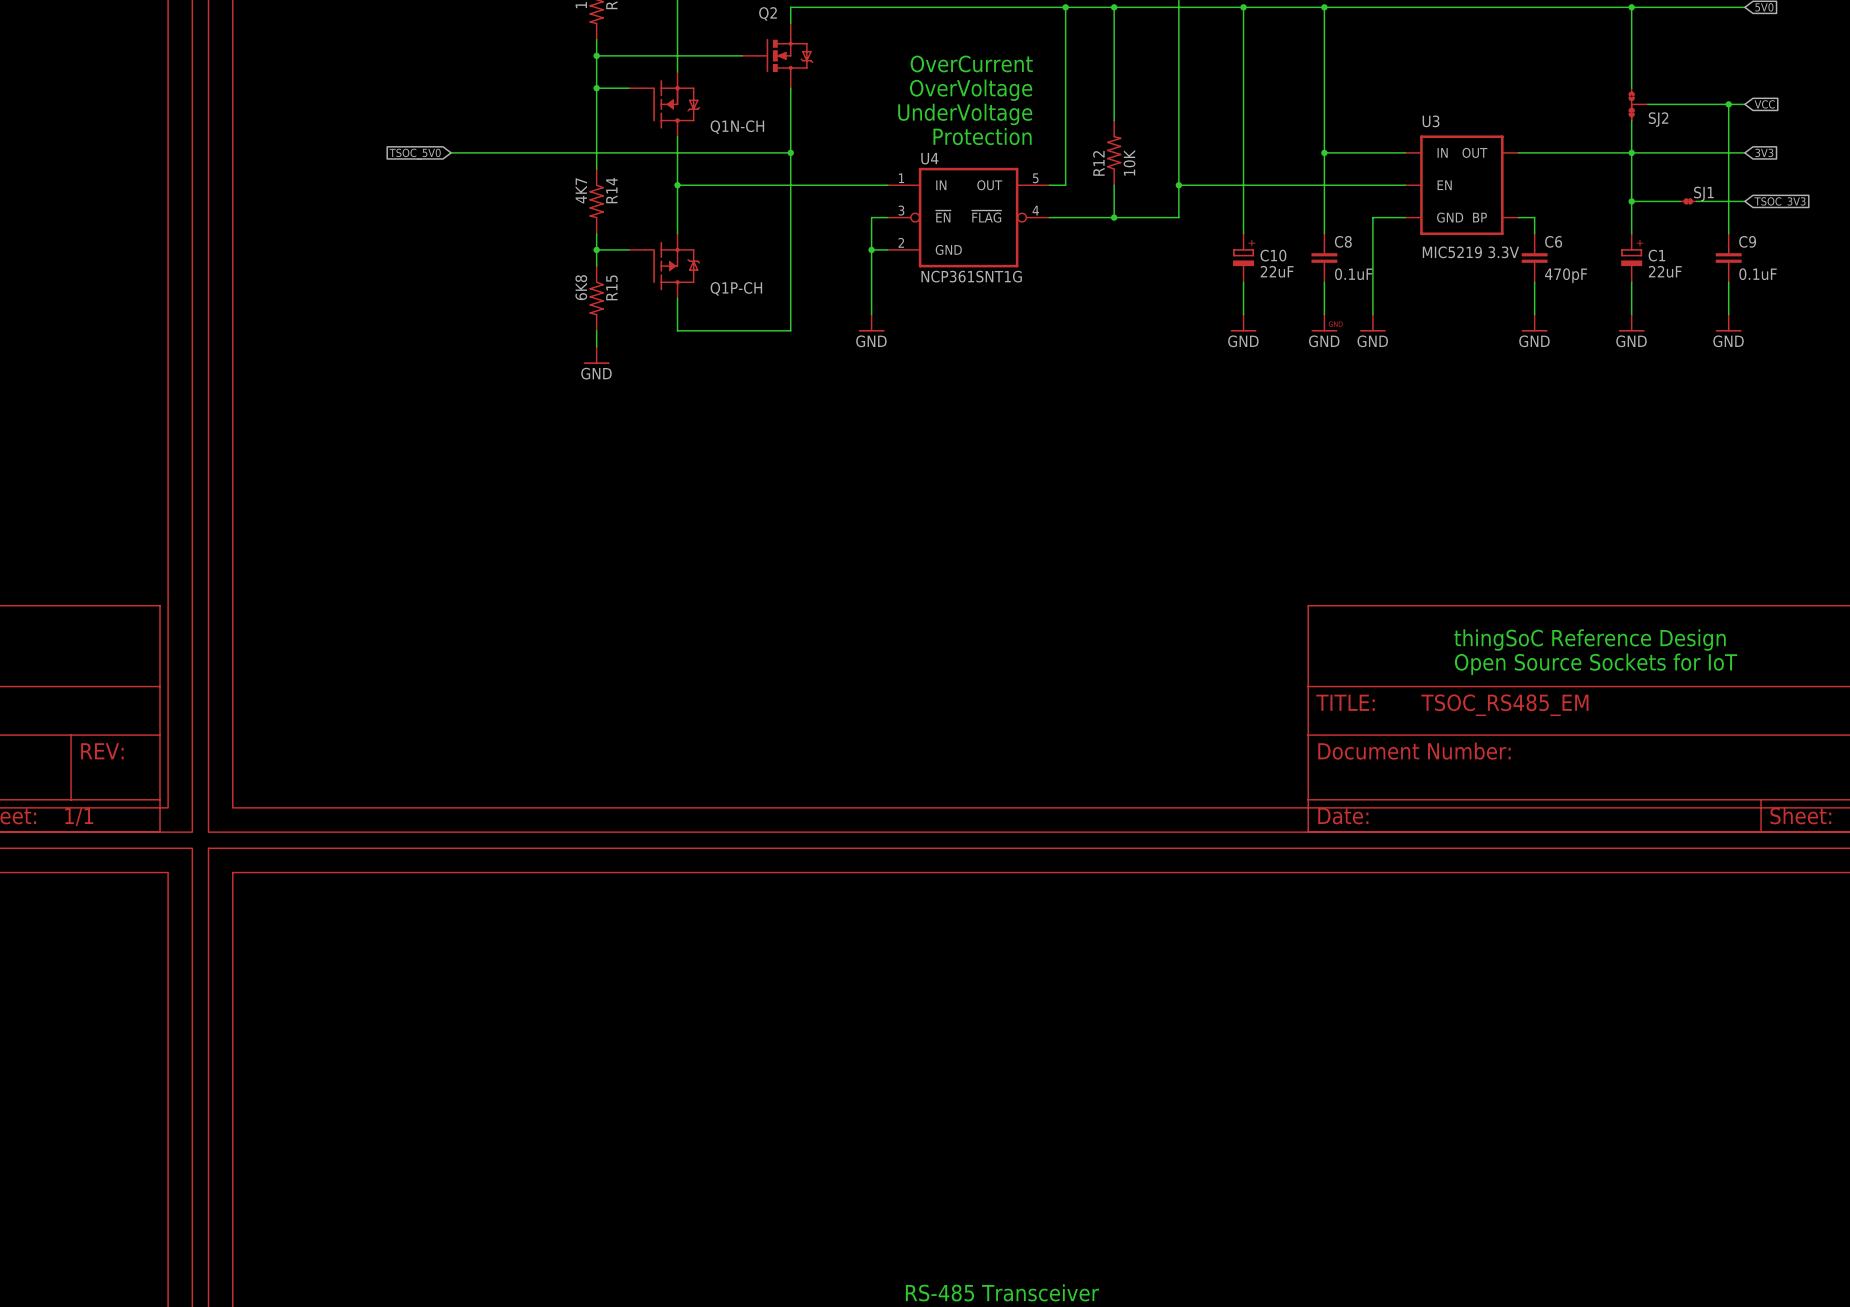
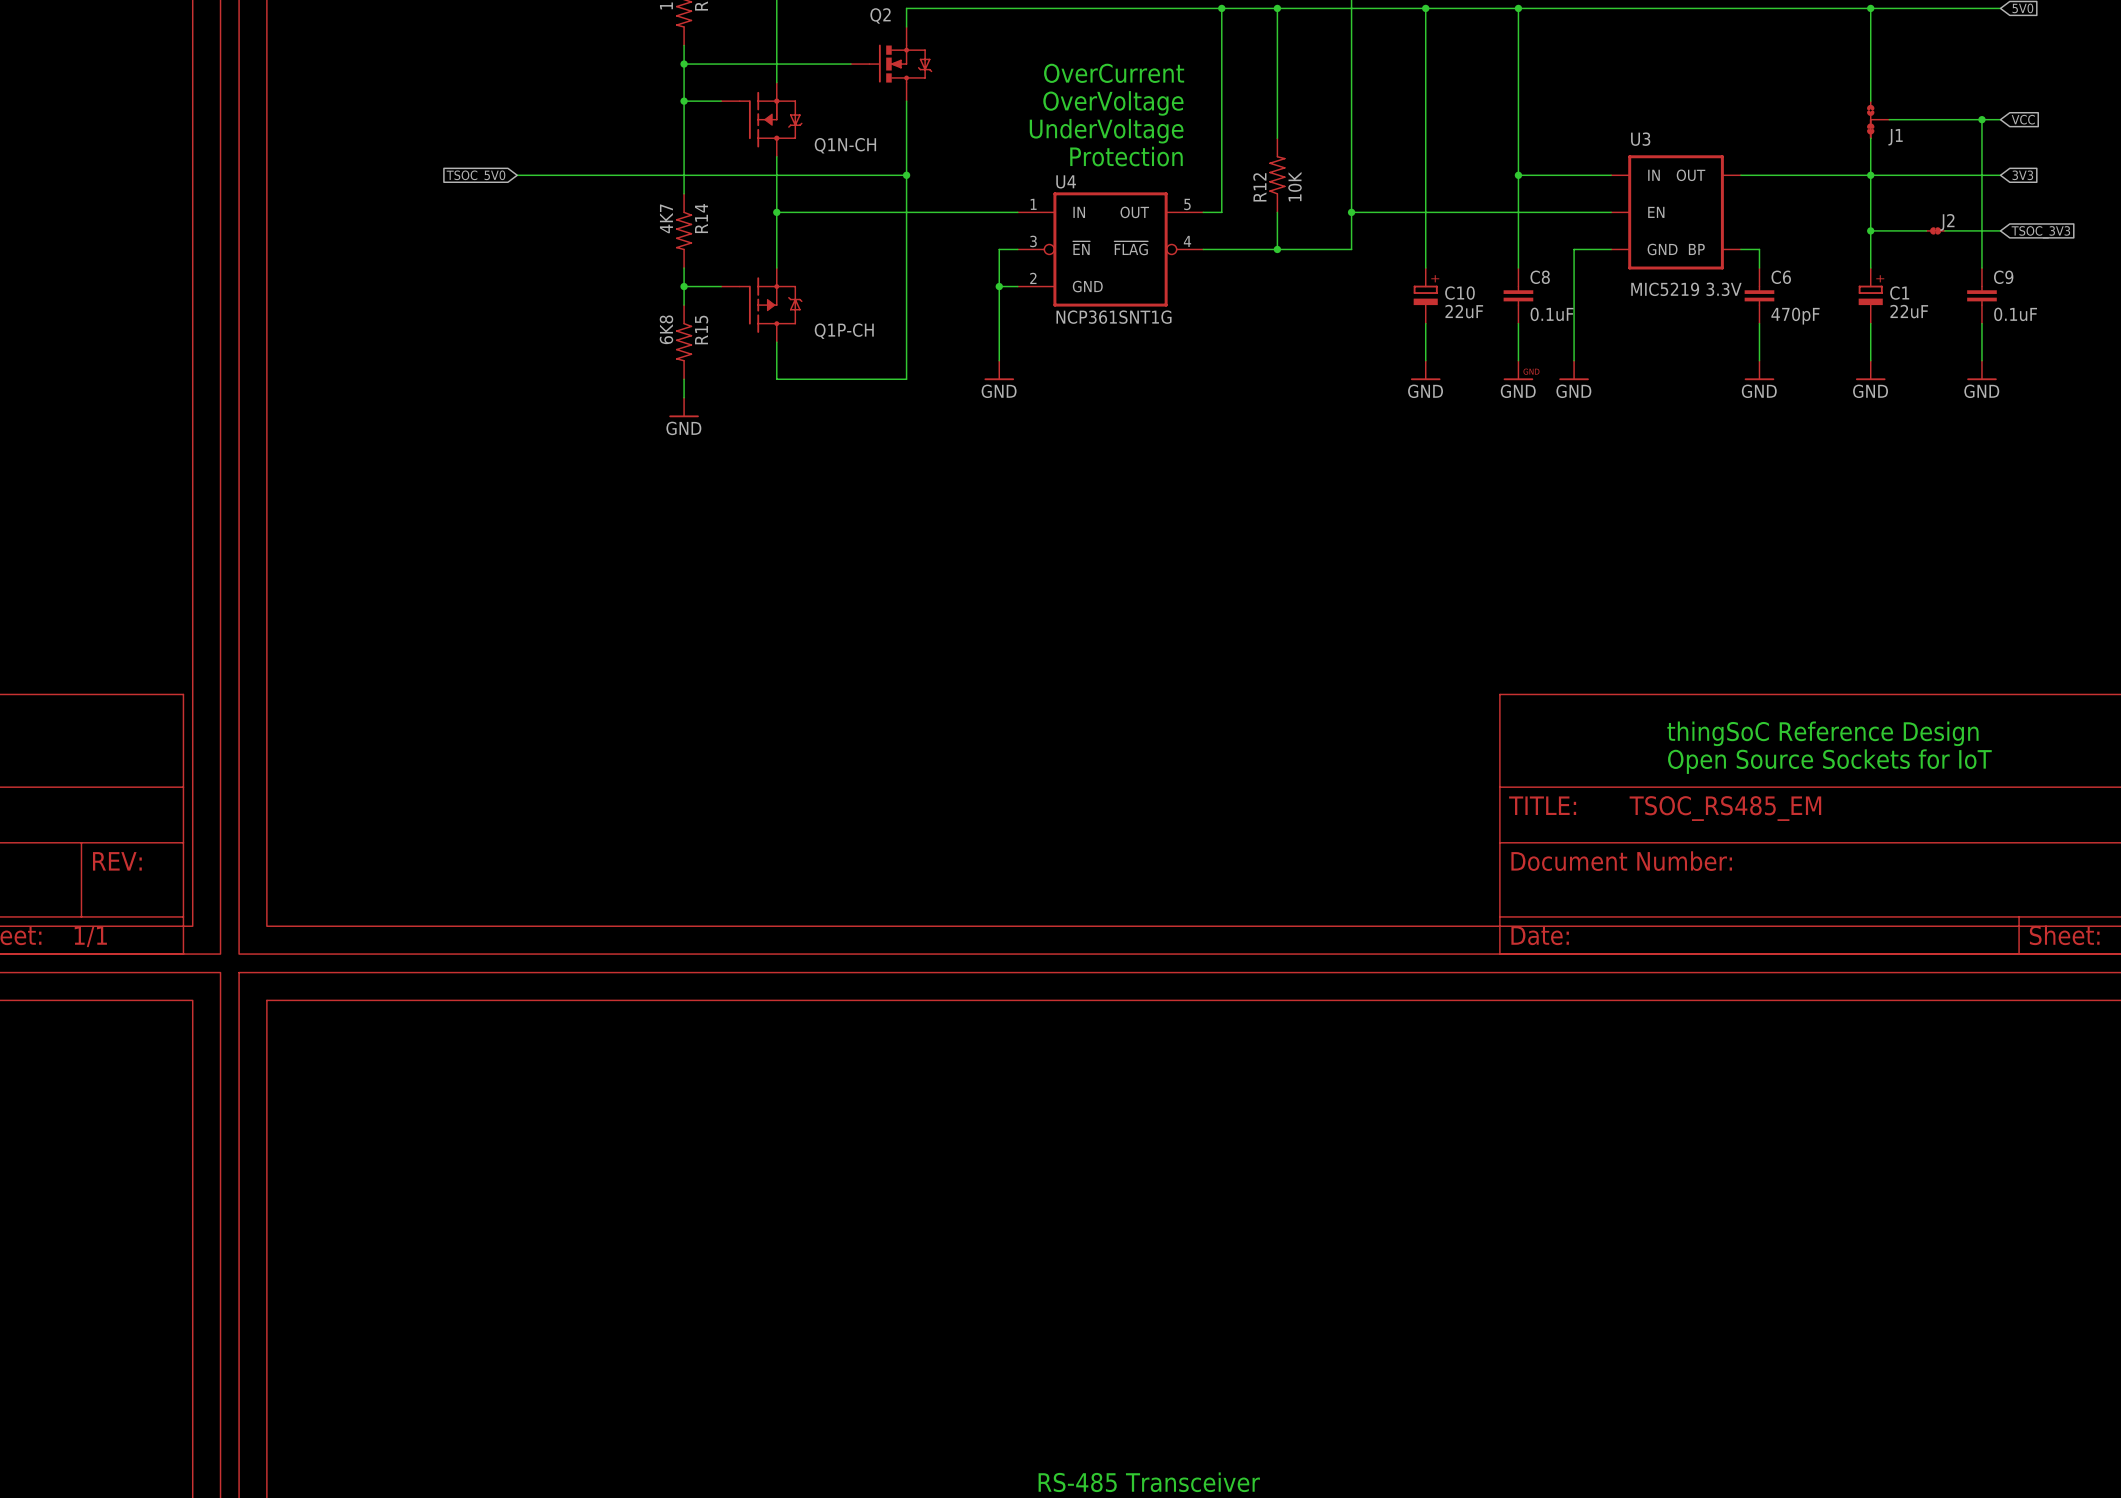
SJ2 name: SJ2 (1658, 119) -> J1 (1895, 137)
SJ1 name: SJ1 (1703, 193) -> J2 (1947, 222)

